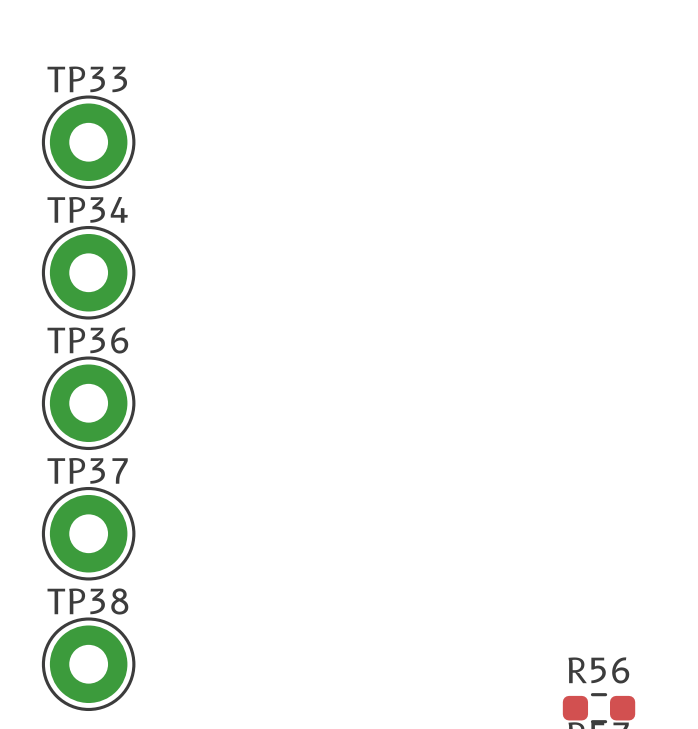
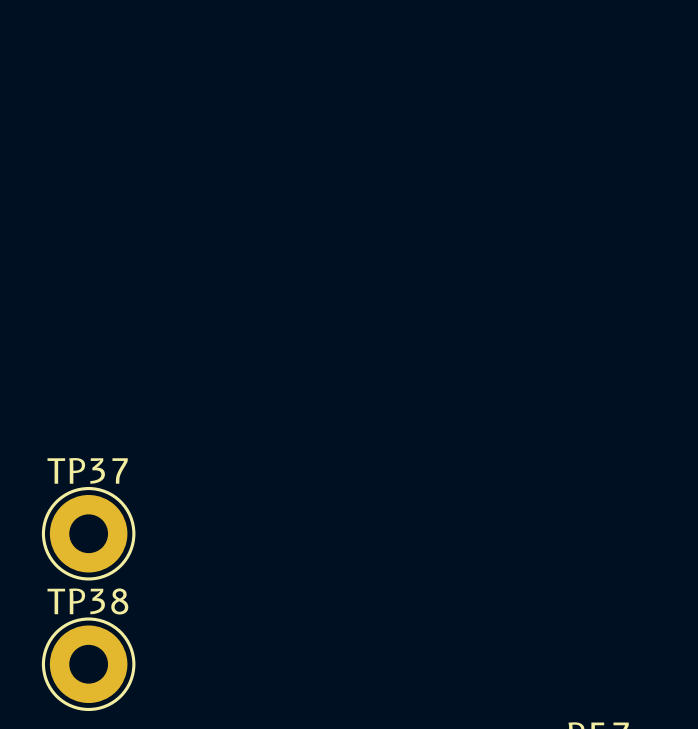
TP33: (88, 142) -> none
TP34: (88, 272) -> none
TP36: (88, 403) -> none
R56: (599, 708) -> none

